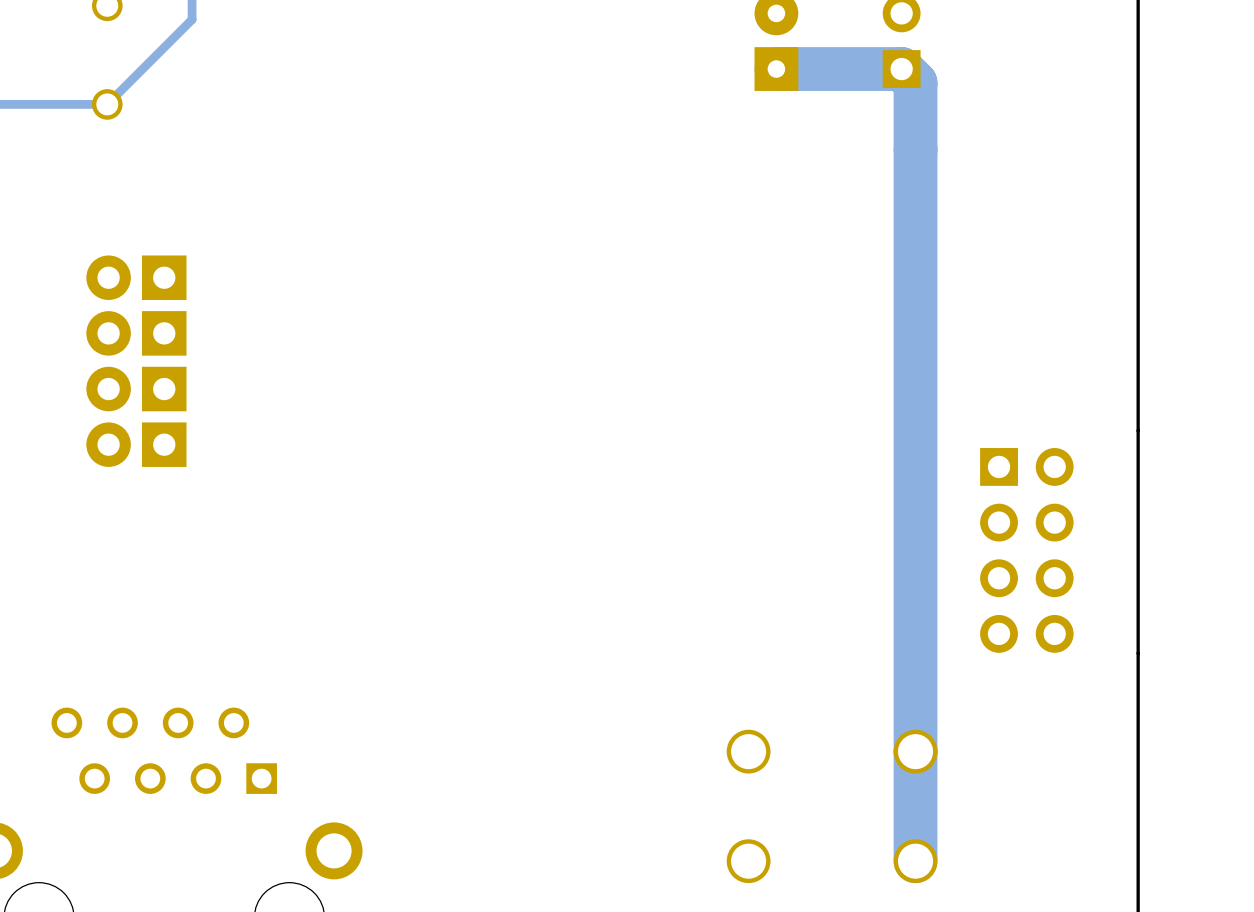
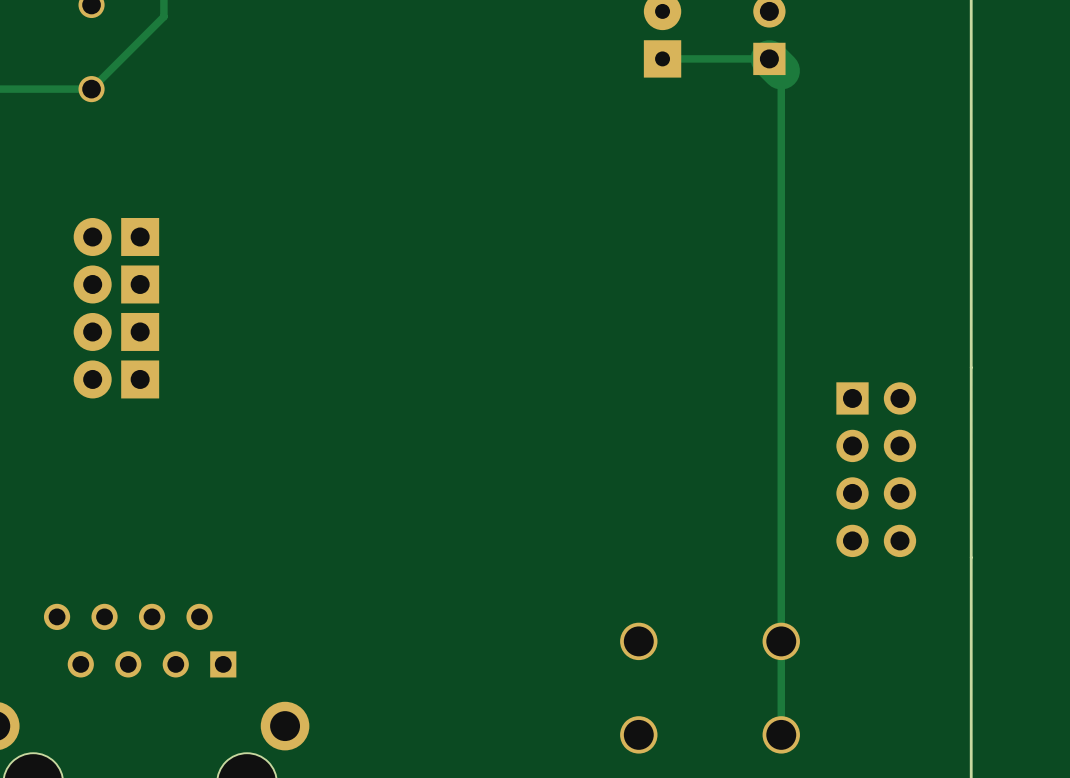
track width: thick (901, 69) (776, 69) -> thin (769, 58) (662, 58)
track width: thick (915, 82) (915, 861) -> thin (781, 70) (781, 734)

